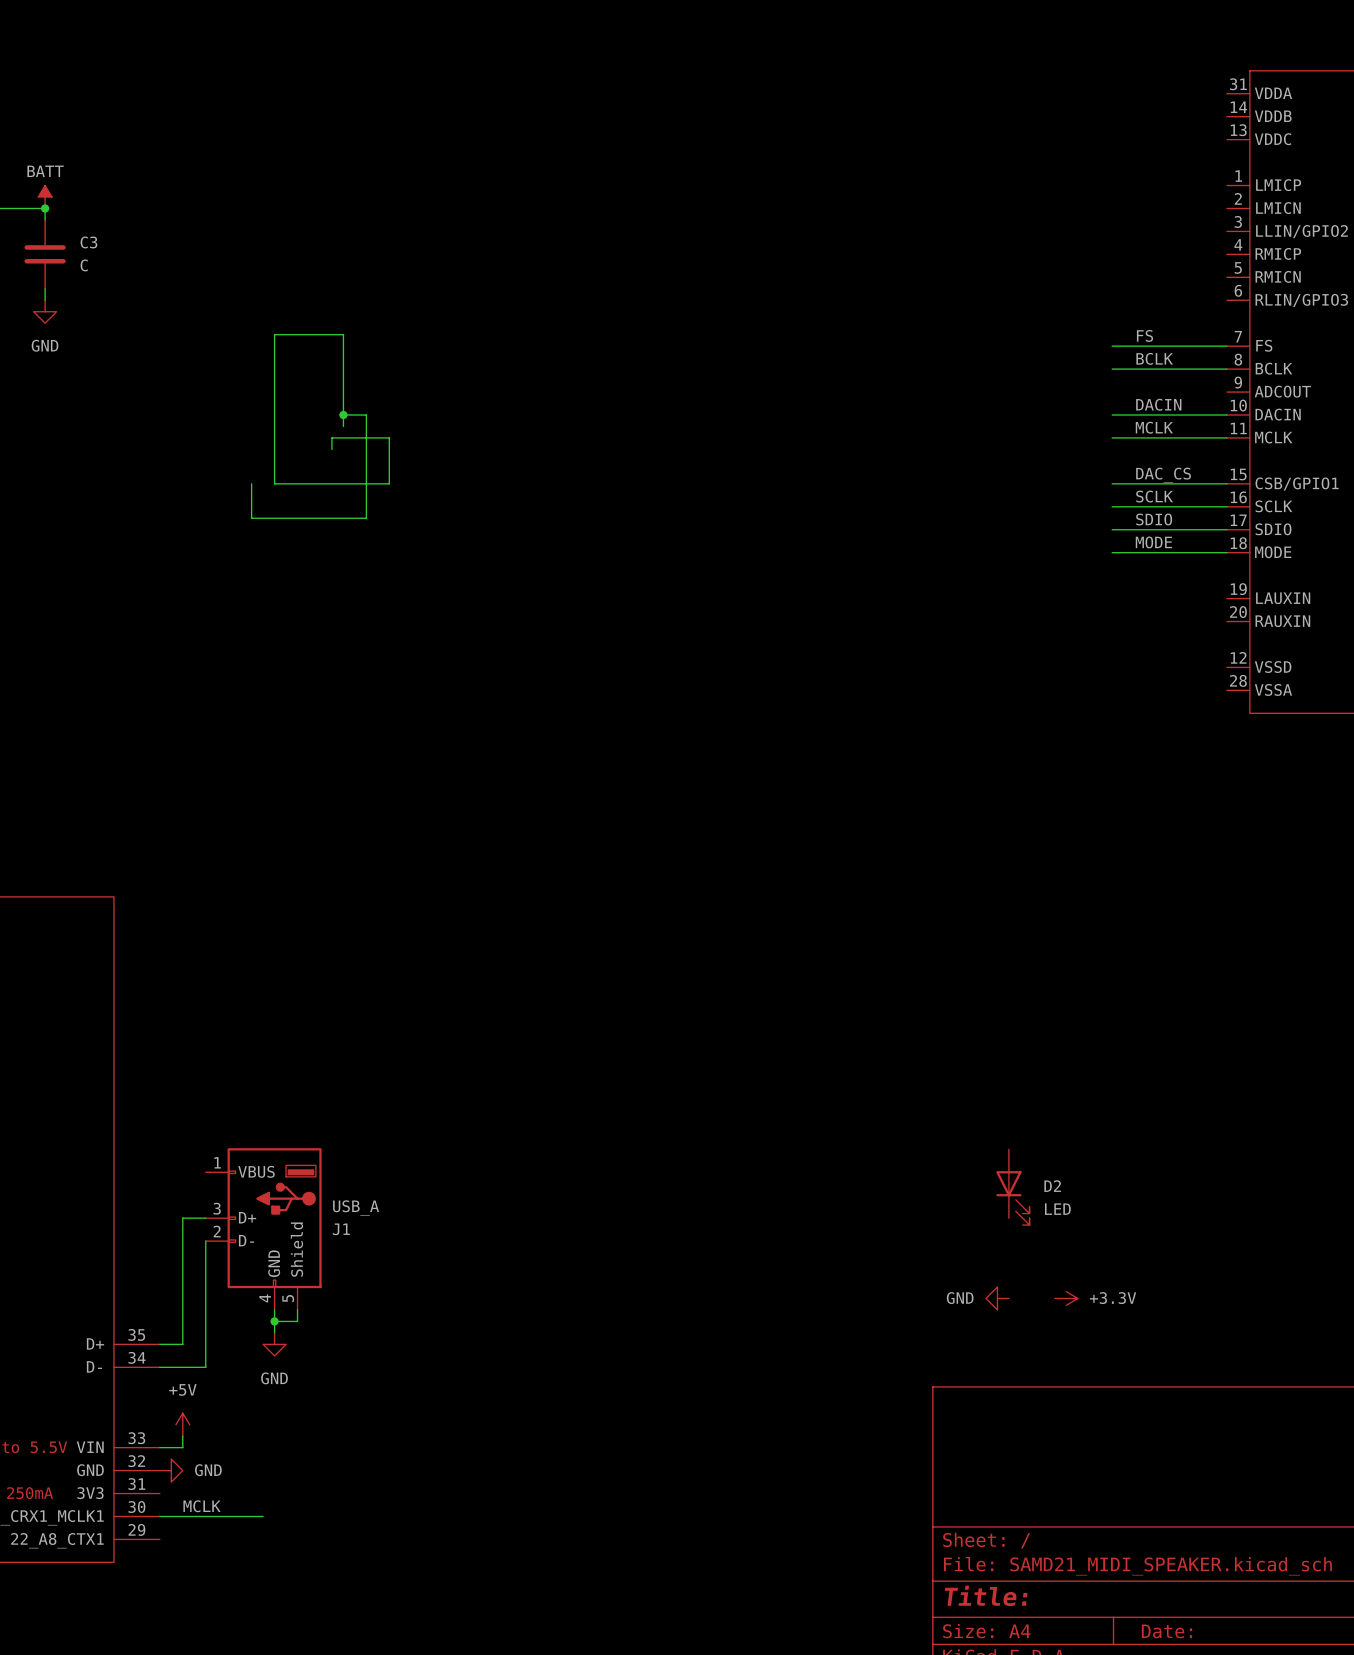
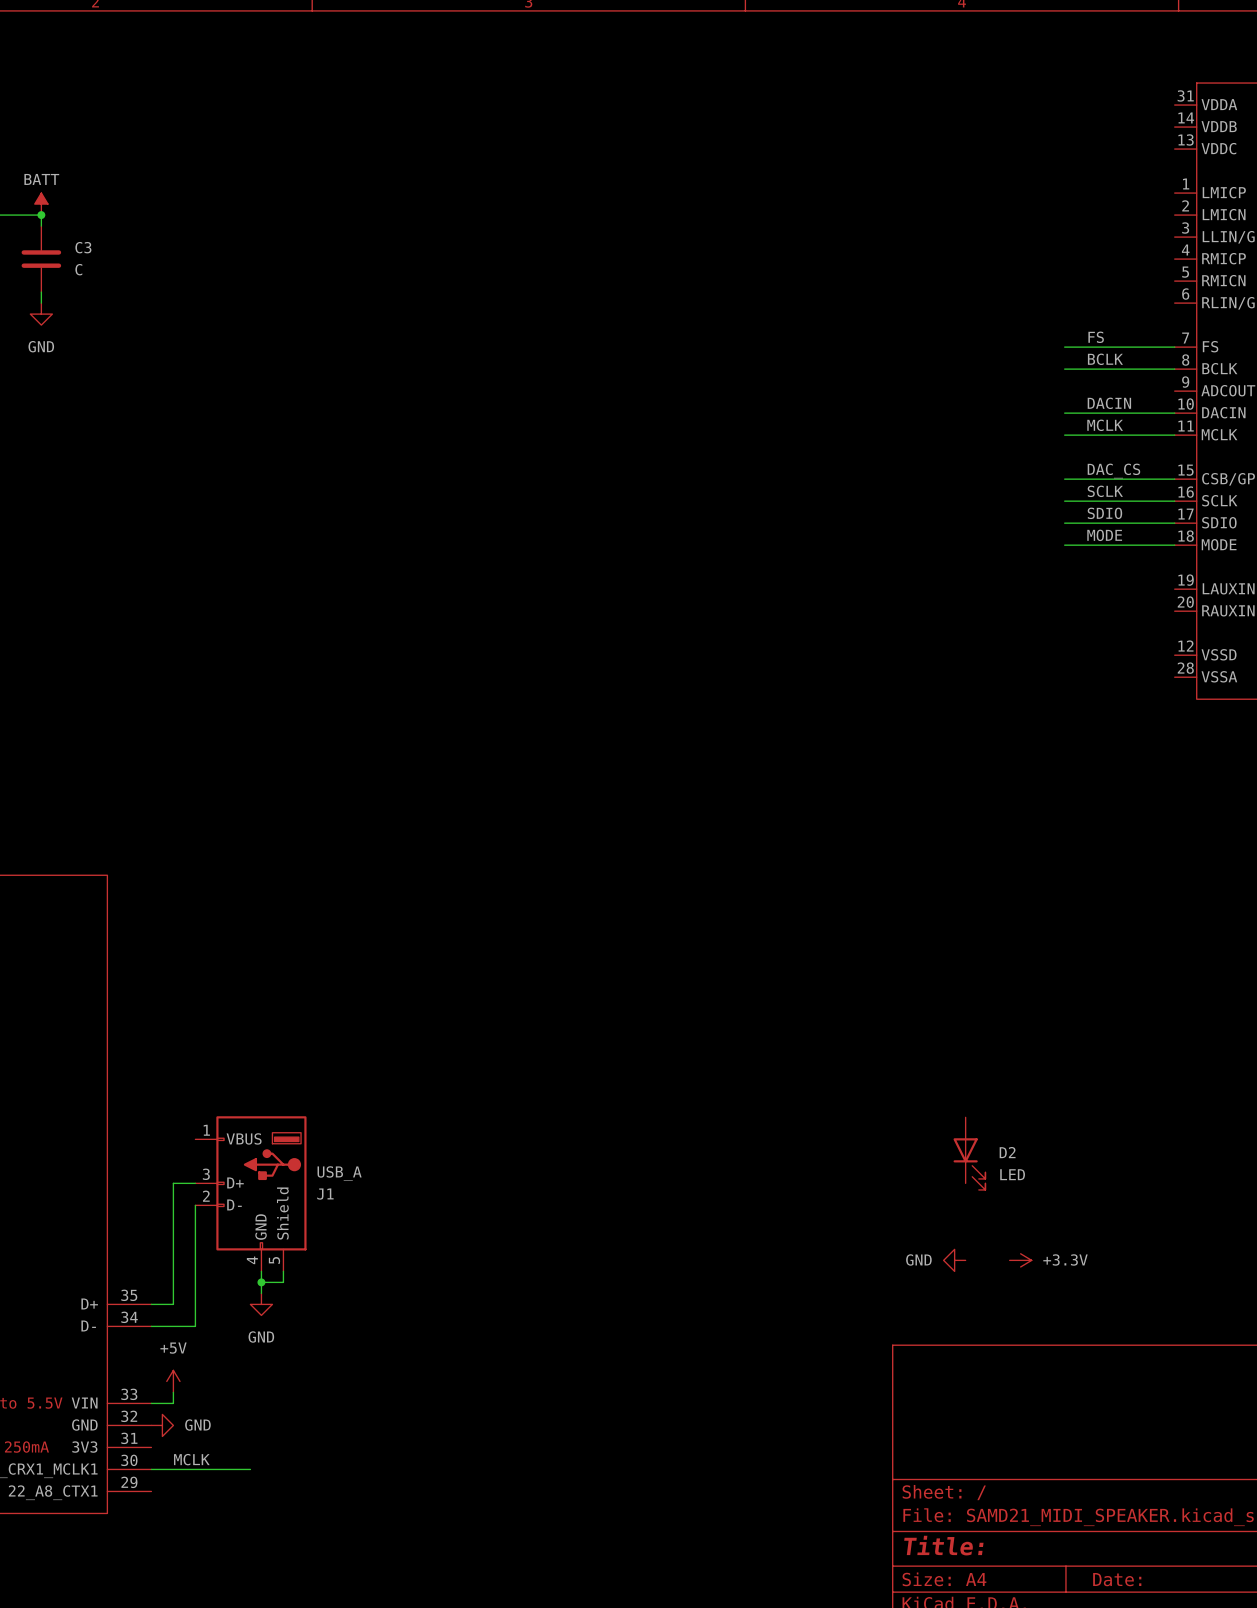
wire: (343, 415) (366, 415) (366, 518) (251, 518) (251, 483) -> none
junction: (343, 415) -> none
wire: (343, 426) (343, 334) (274, 334) (274, 483) (389, 483) (389, 437) (331, 437) (331, 449) -> none

